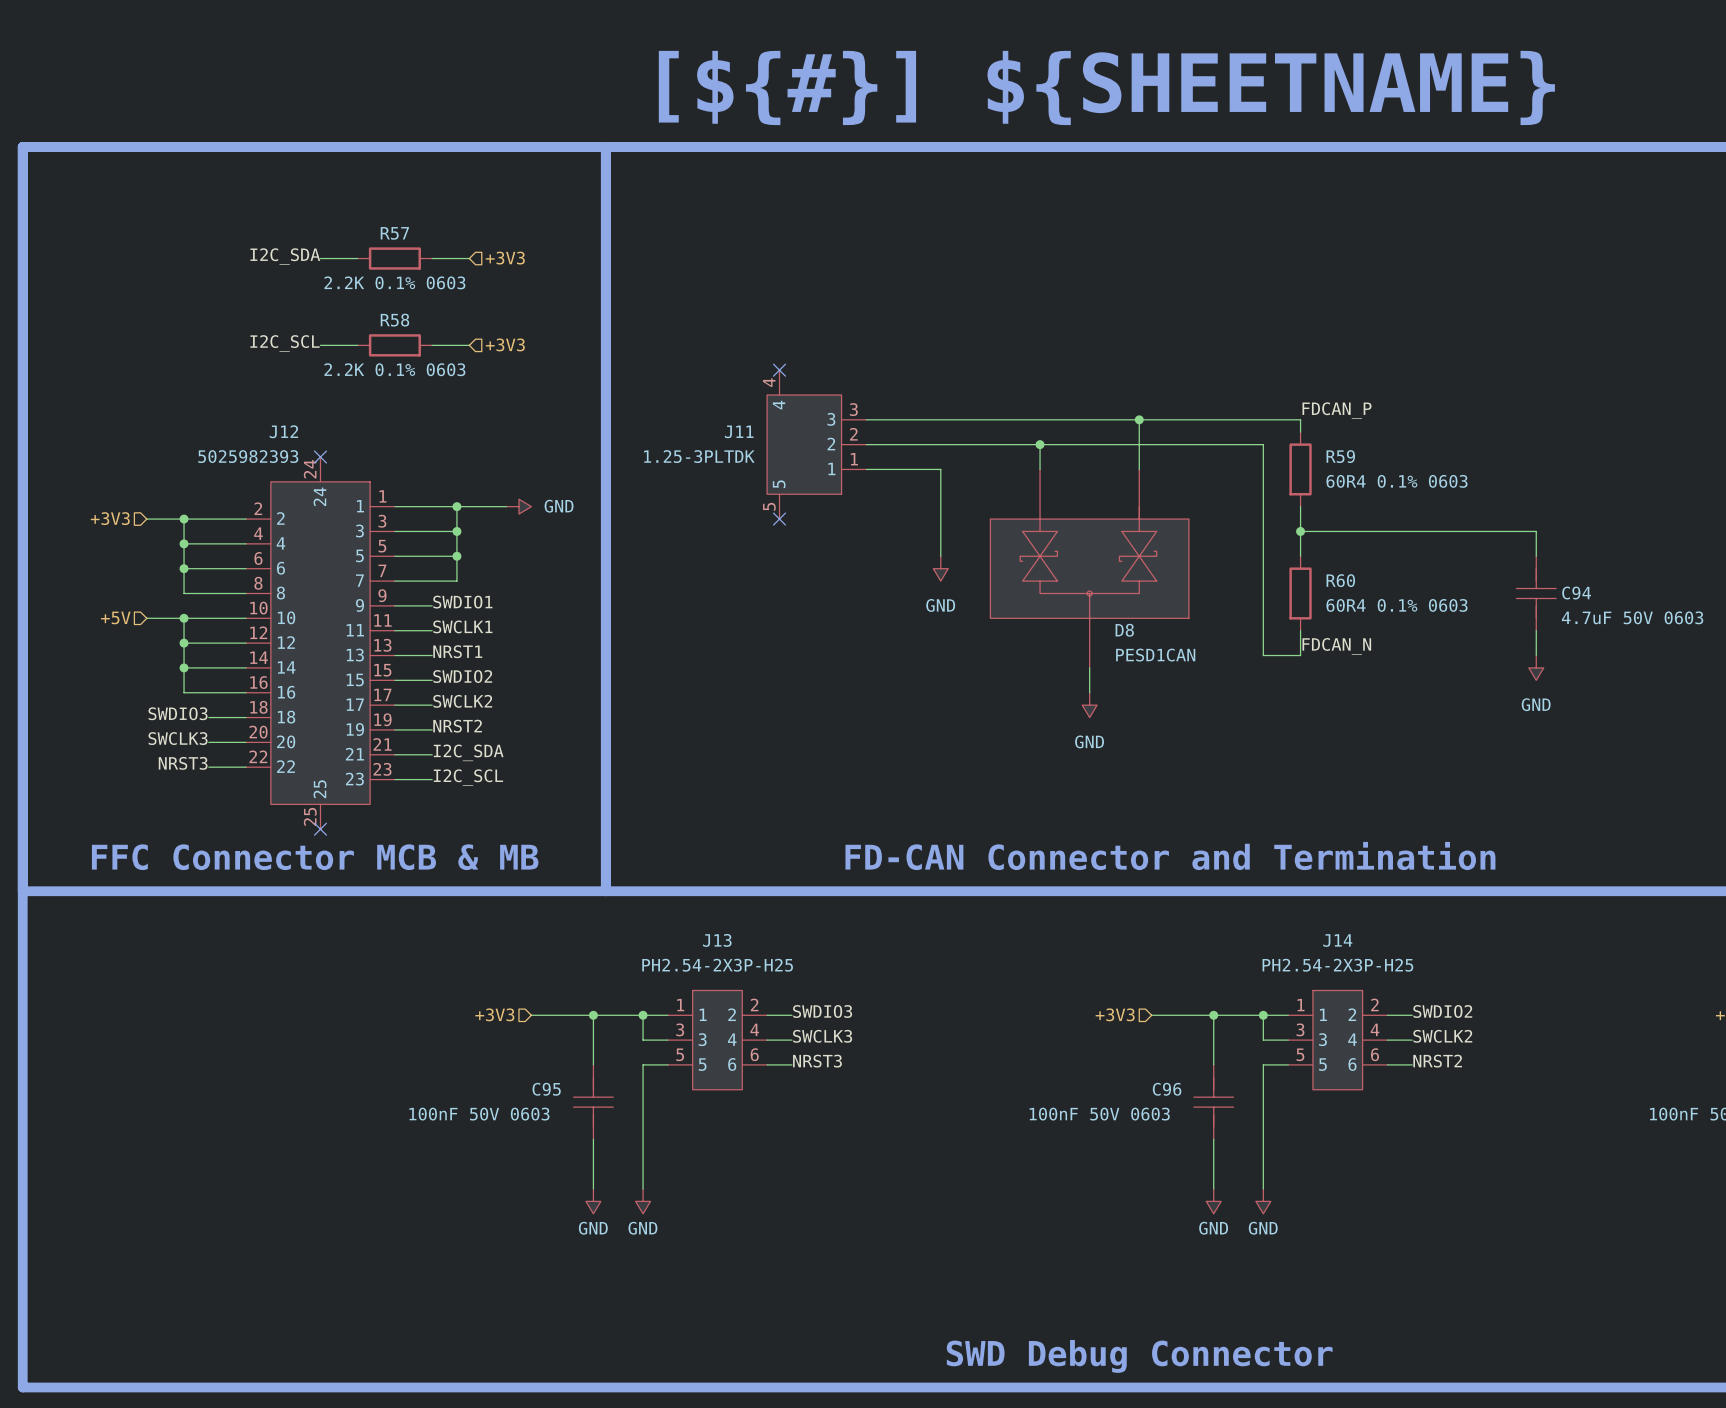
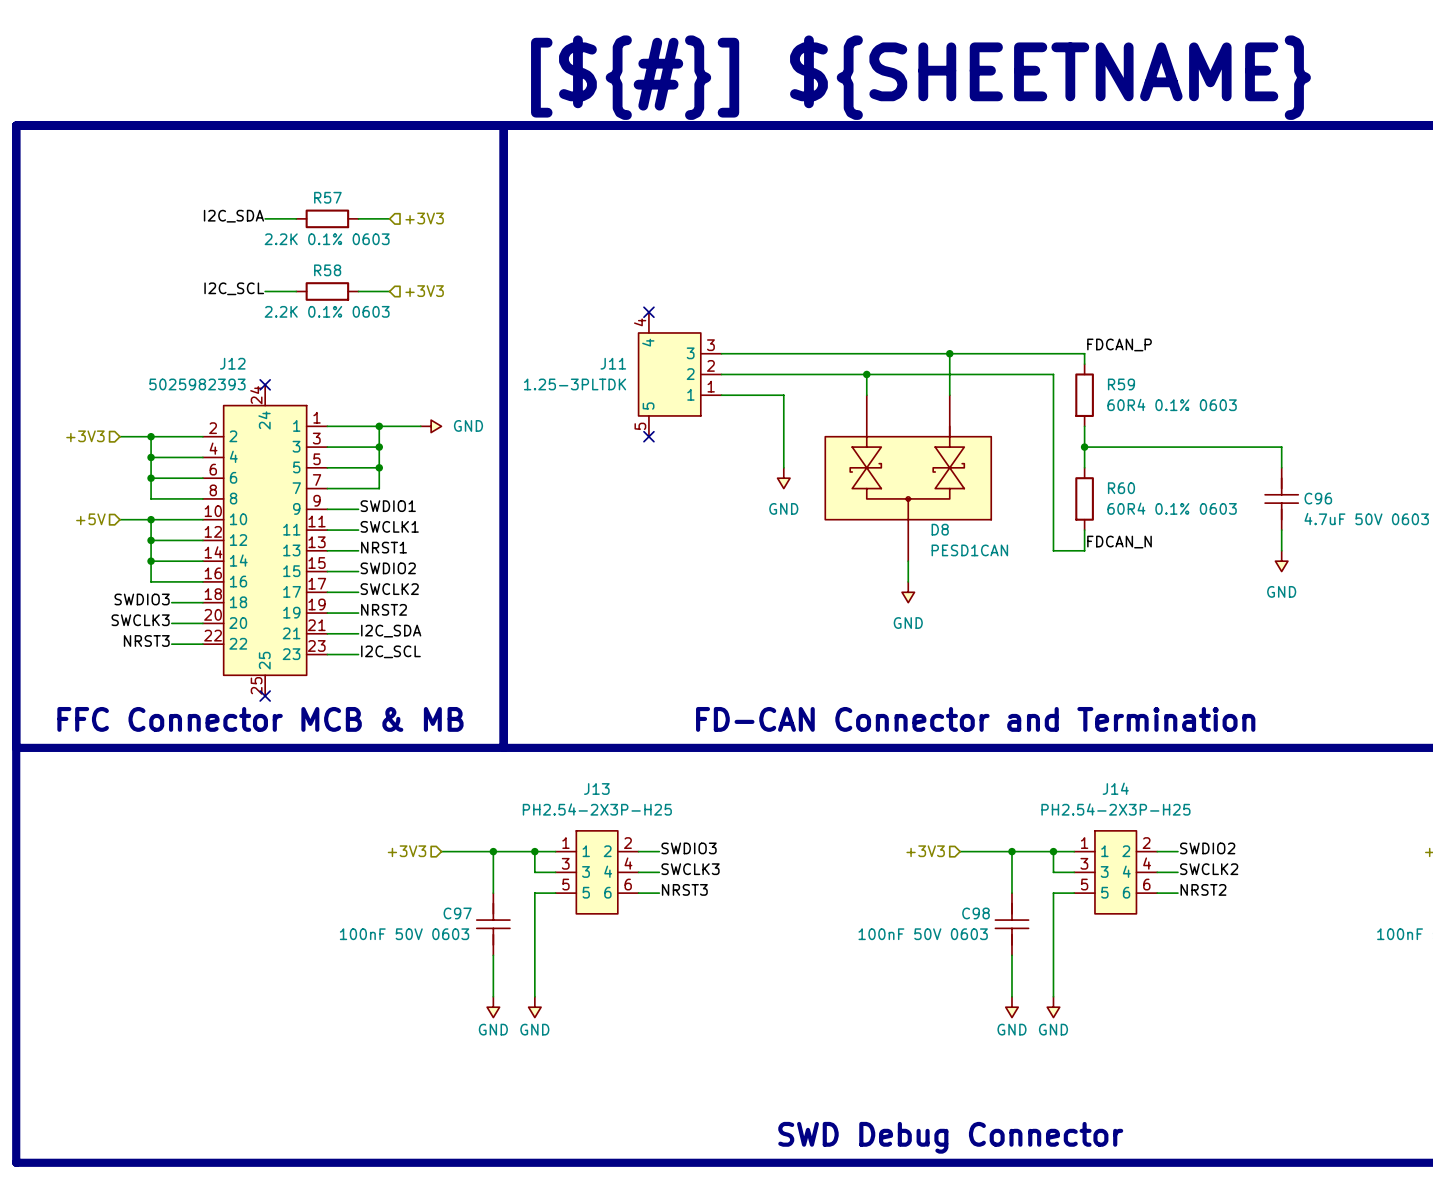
C94 name: C94 (1576, 593) -> C96 (1318, 498)
C95 name: C95 (546, 1089) -> C97 (457, 913)
C96 name: C96 (1167, 1089) -> C98 (976, 913)

